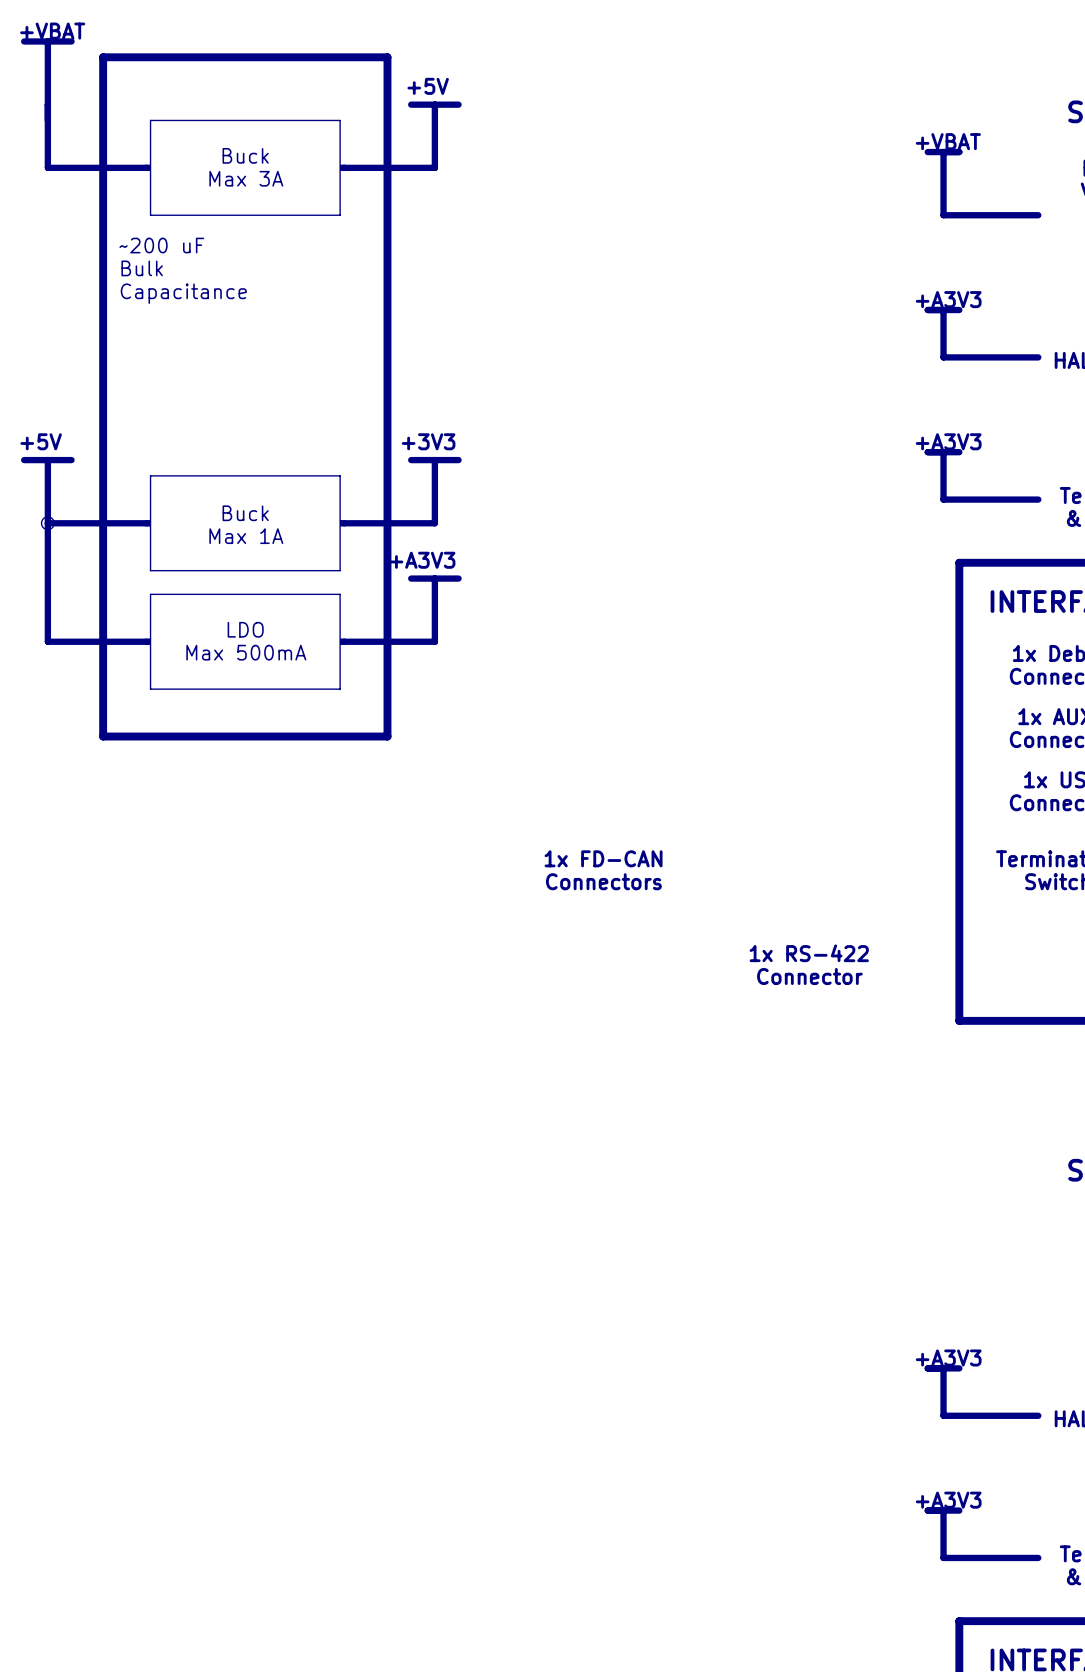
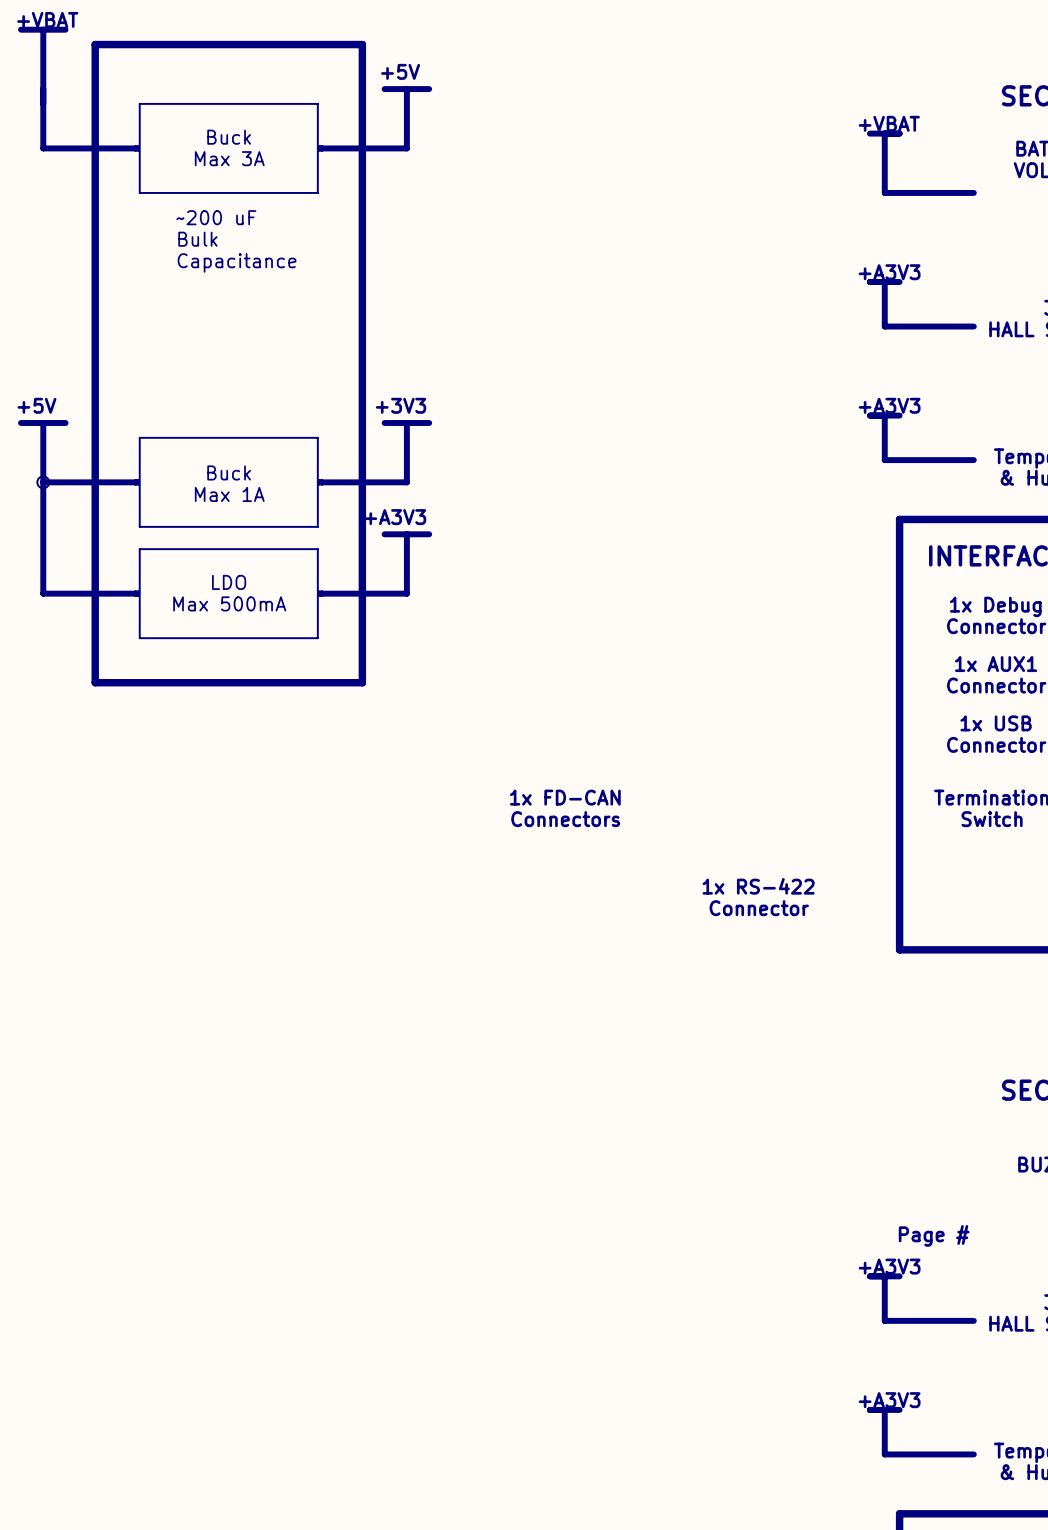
text position: ~200 uF (161, 245) -> ~200 uF (216, 217)
text position: Bulk (142, 268) -> Bulk (197, 239)
text position: Capacitance (183, 293) -> Capacitance (237, 262)
text: none -> Page # (934, 1235)

